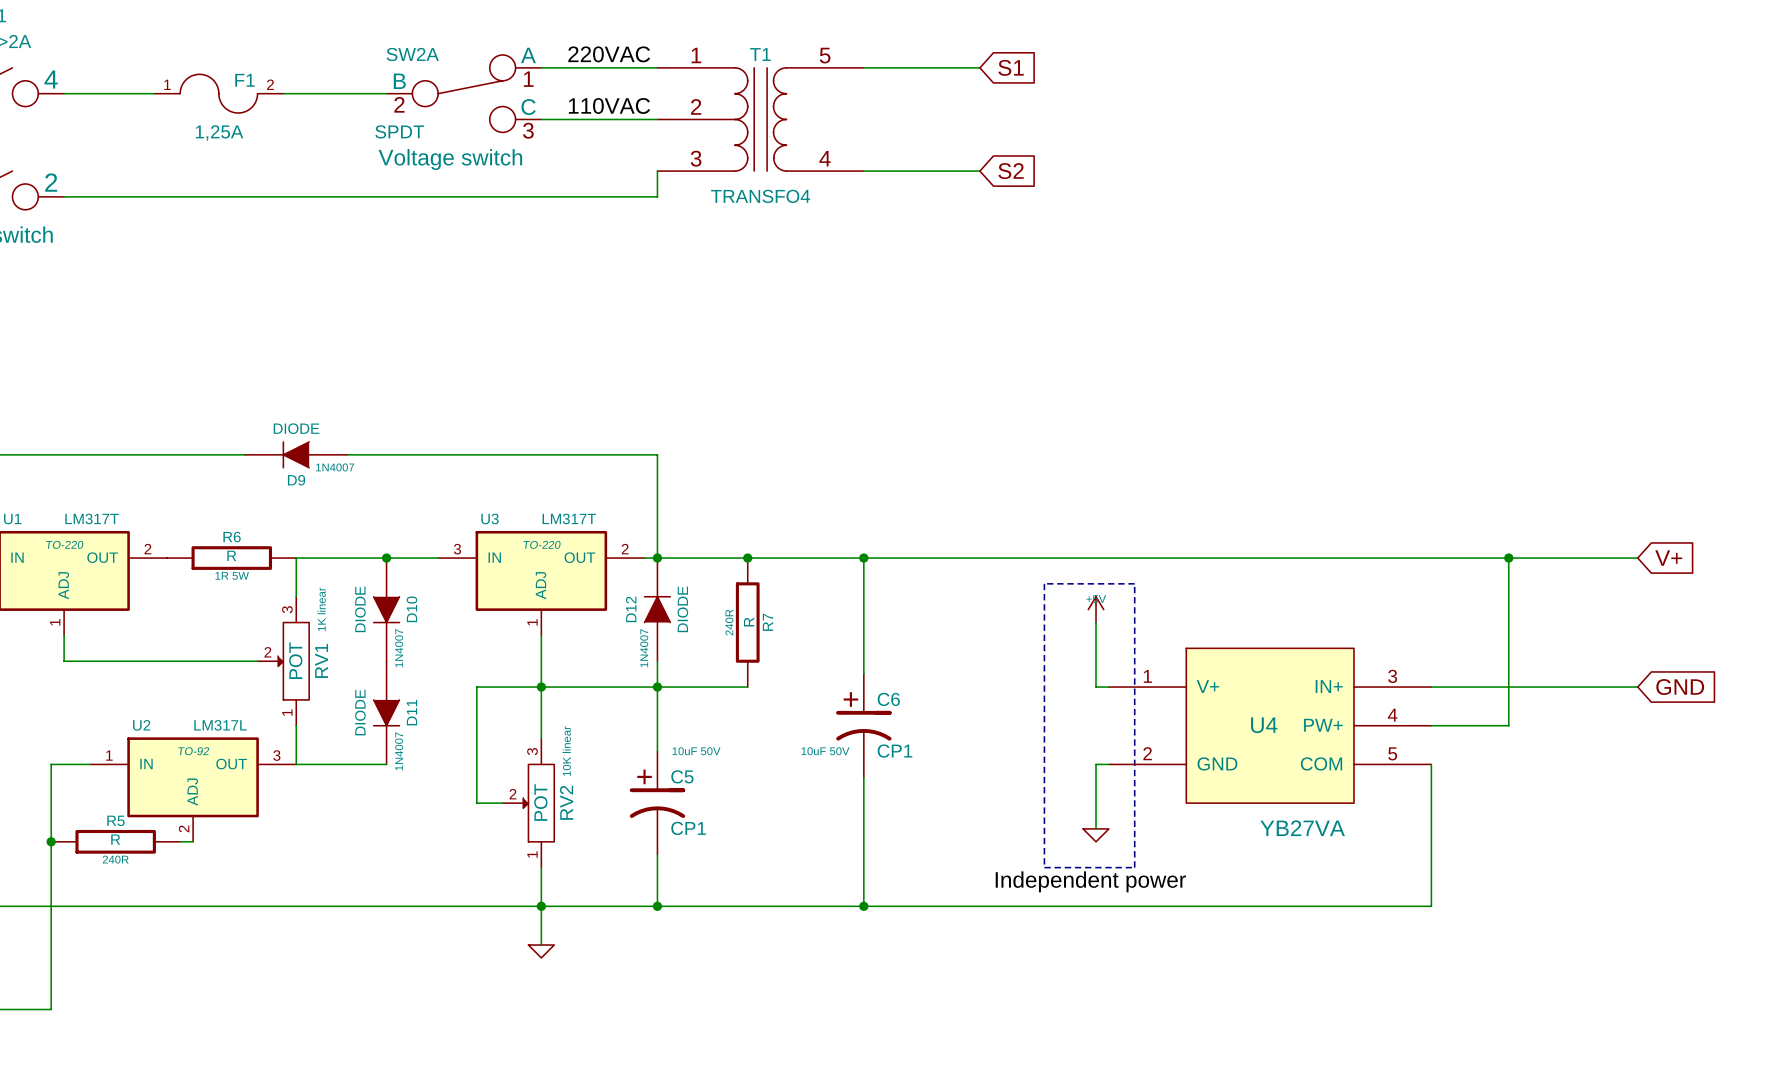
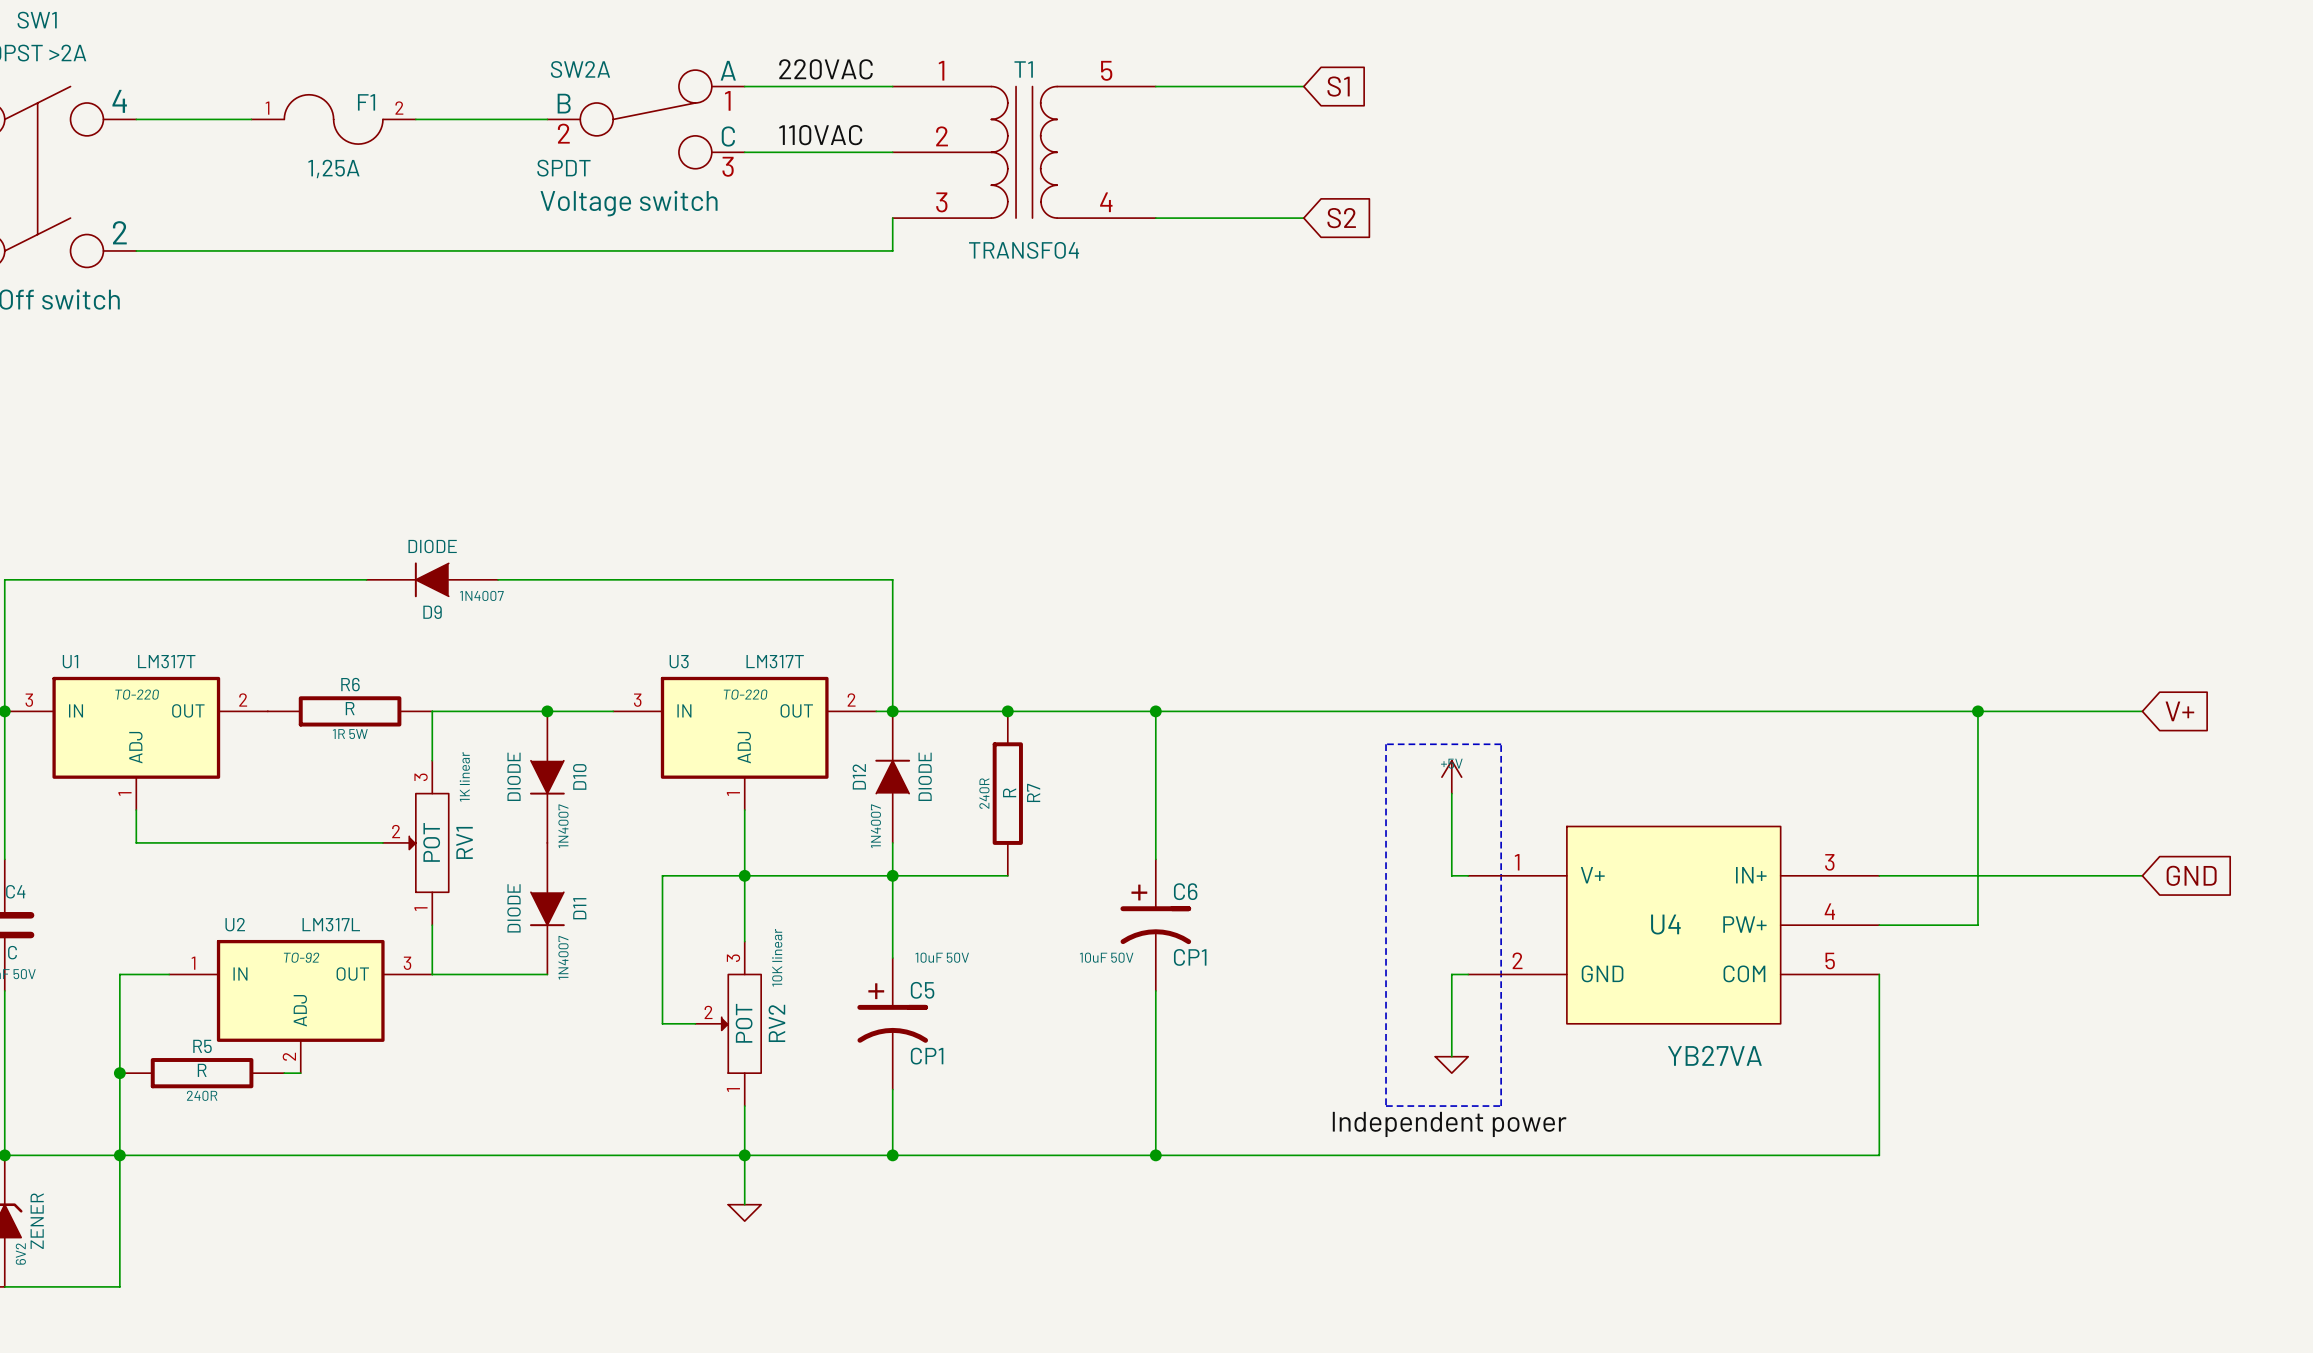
junction: none -> (119, 1155)

